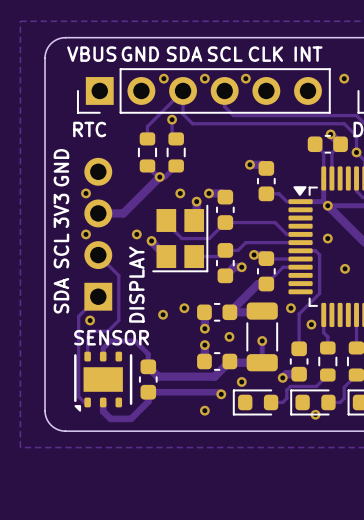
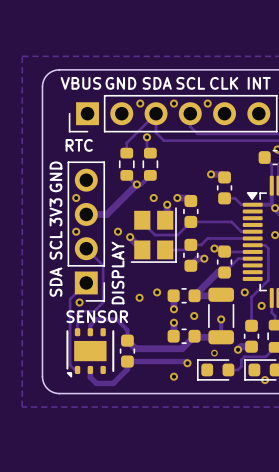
part side: bottom (98, 234) -> top (86, 231)
via: (241, 381) -> none
via: none -> (214, 353)

